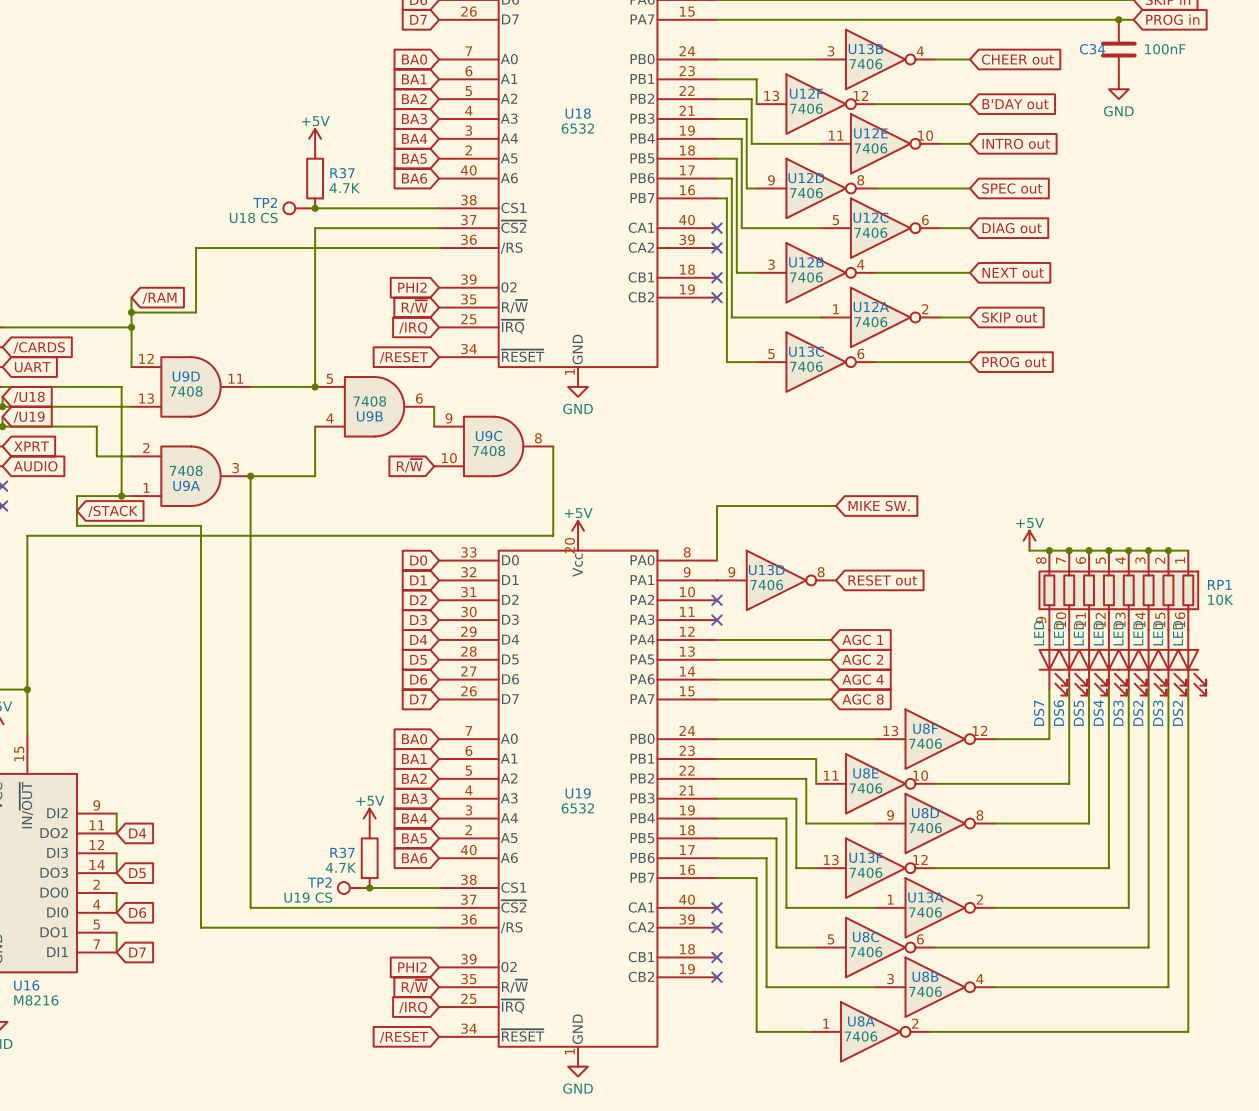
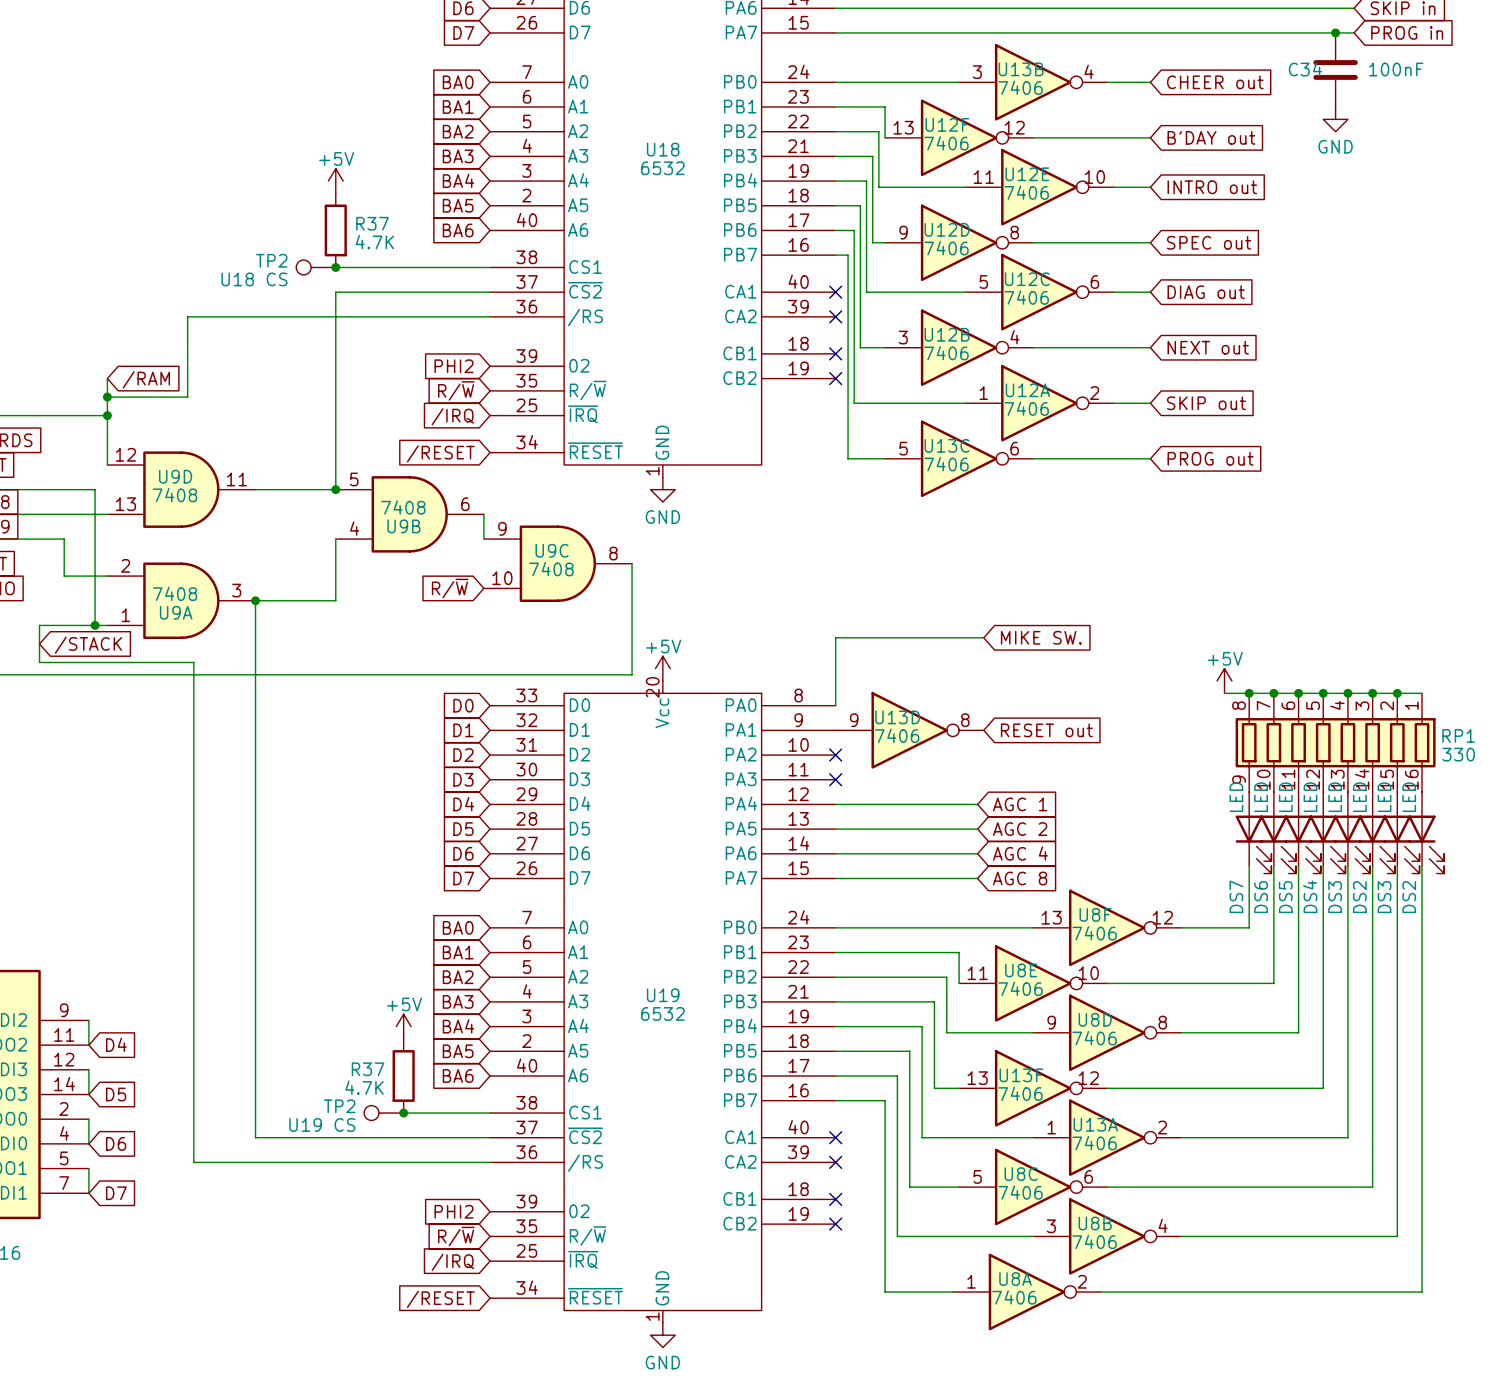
RP1 value: 10K (1220, 599) -> 330 (1458, 754)

